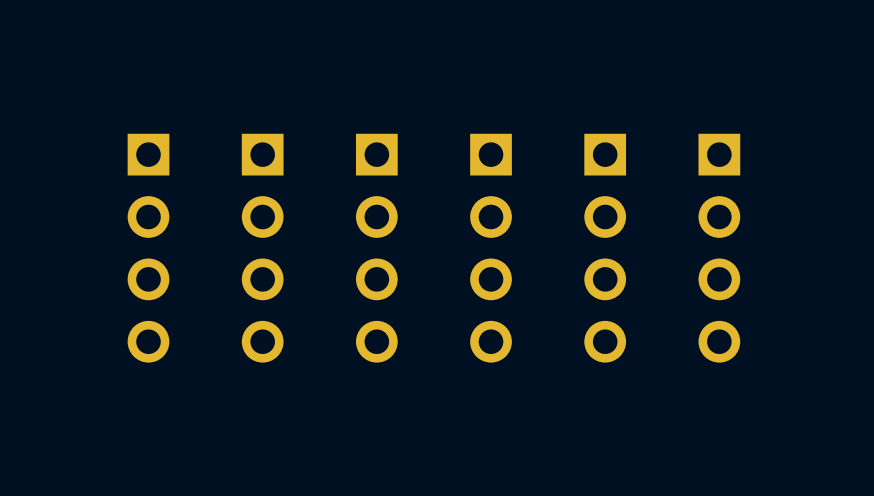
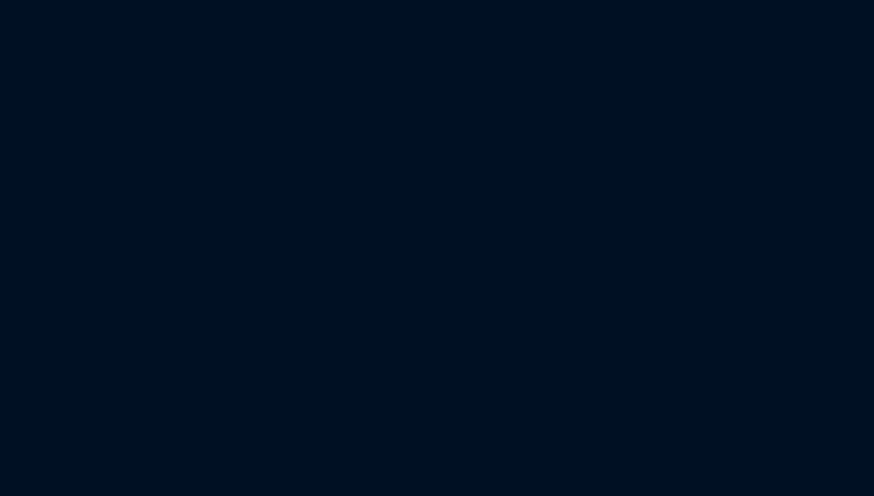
part: (148, 248) -> none
part: (262, 248) -> none
part: (376, 248) -> none
part: (491, 248) -> none
part: (605, 248) -> none
part: (719, 248) -> none

